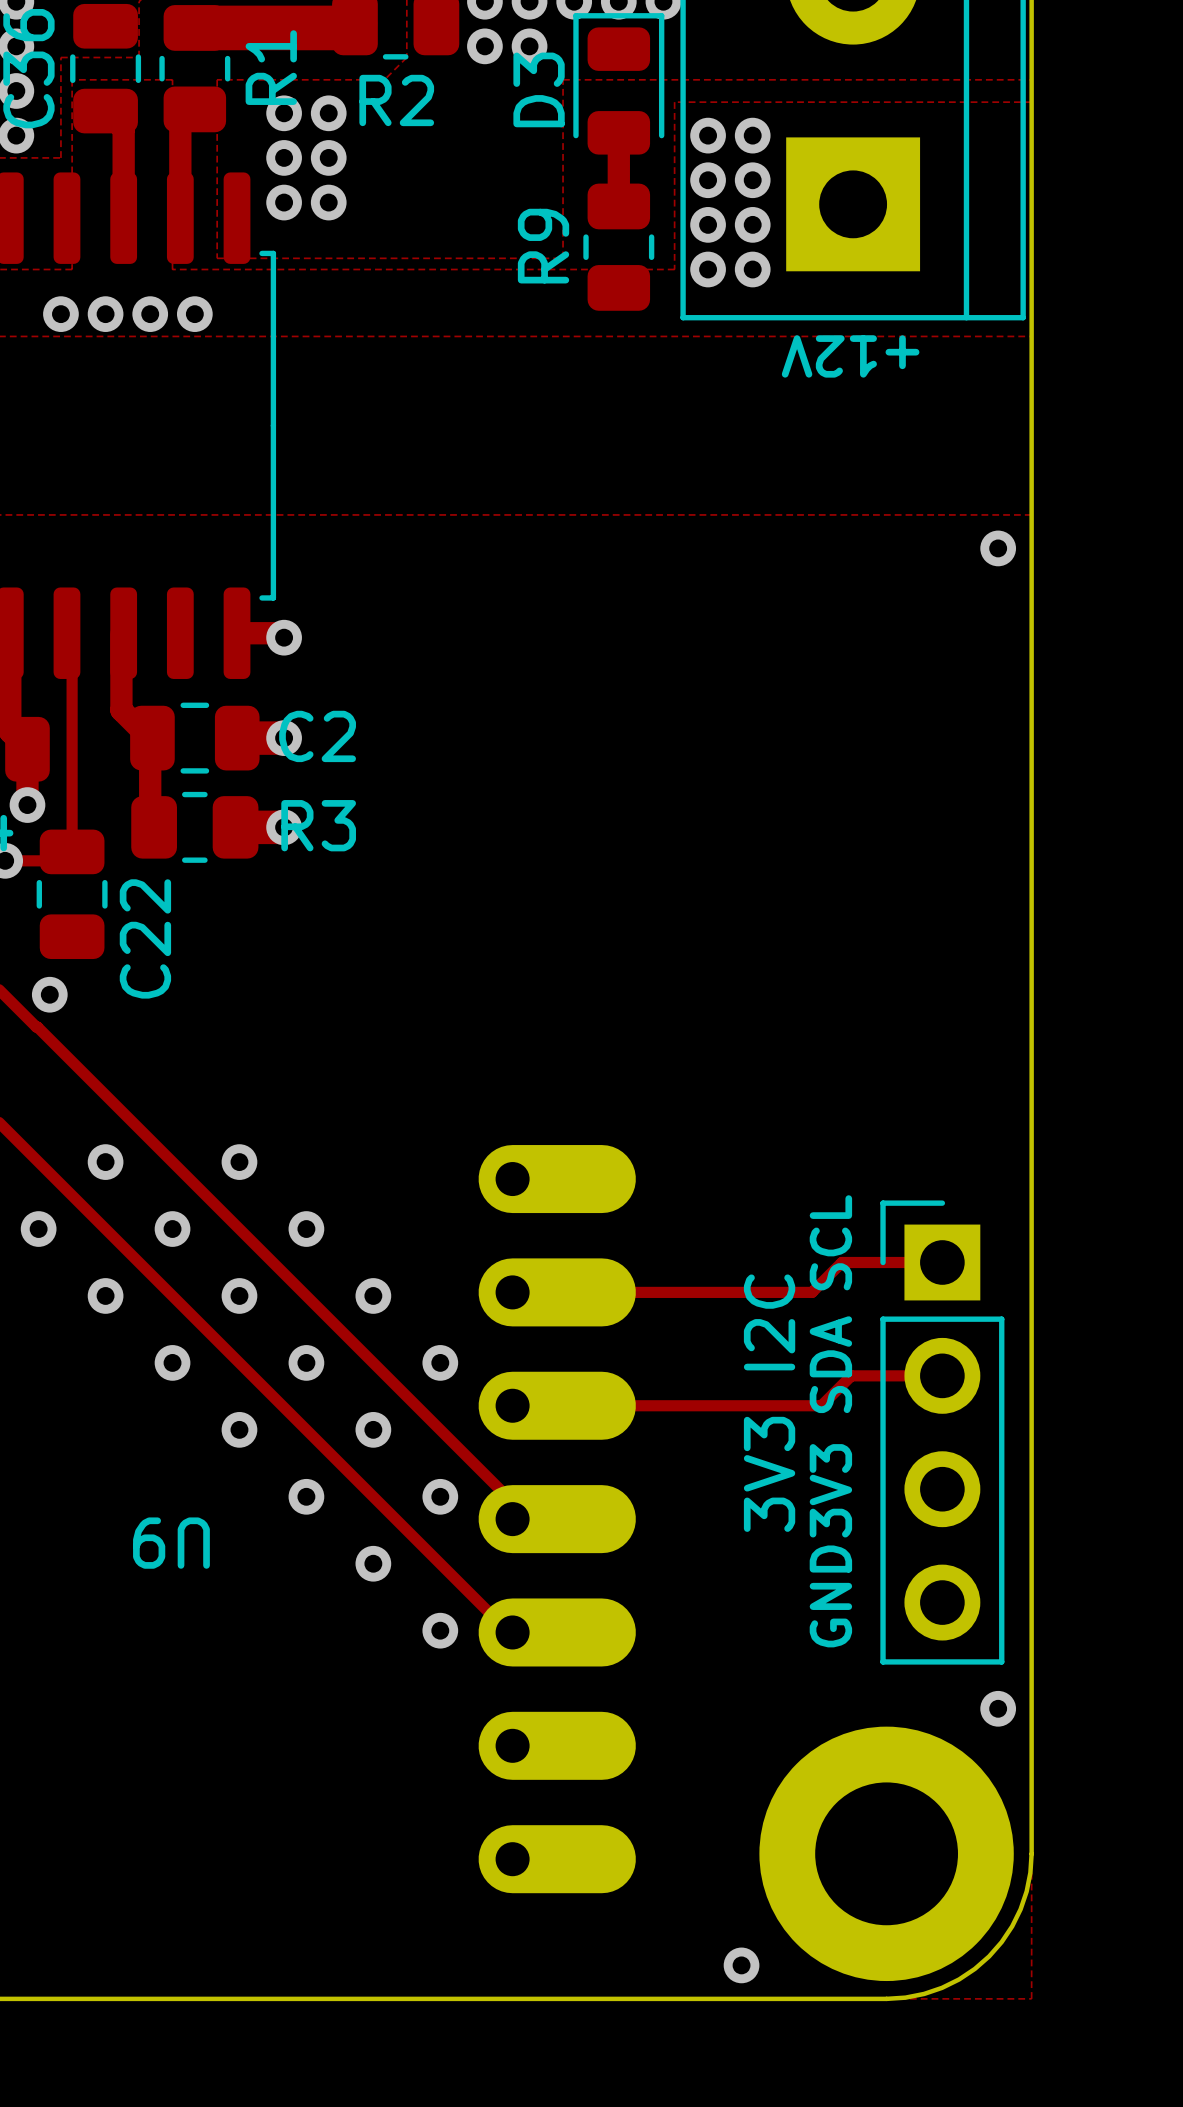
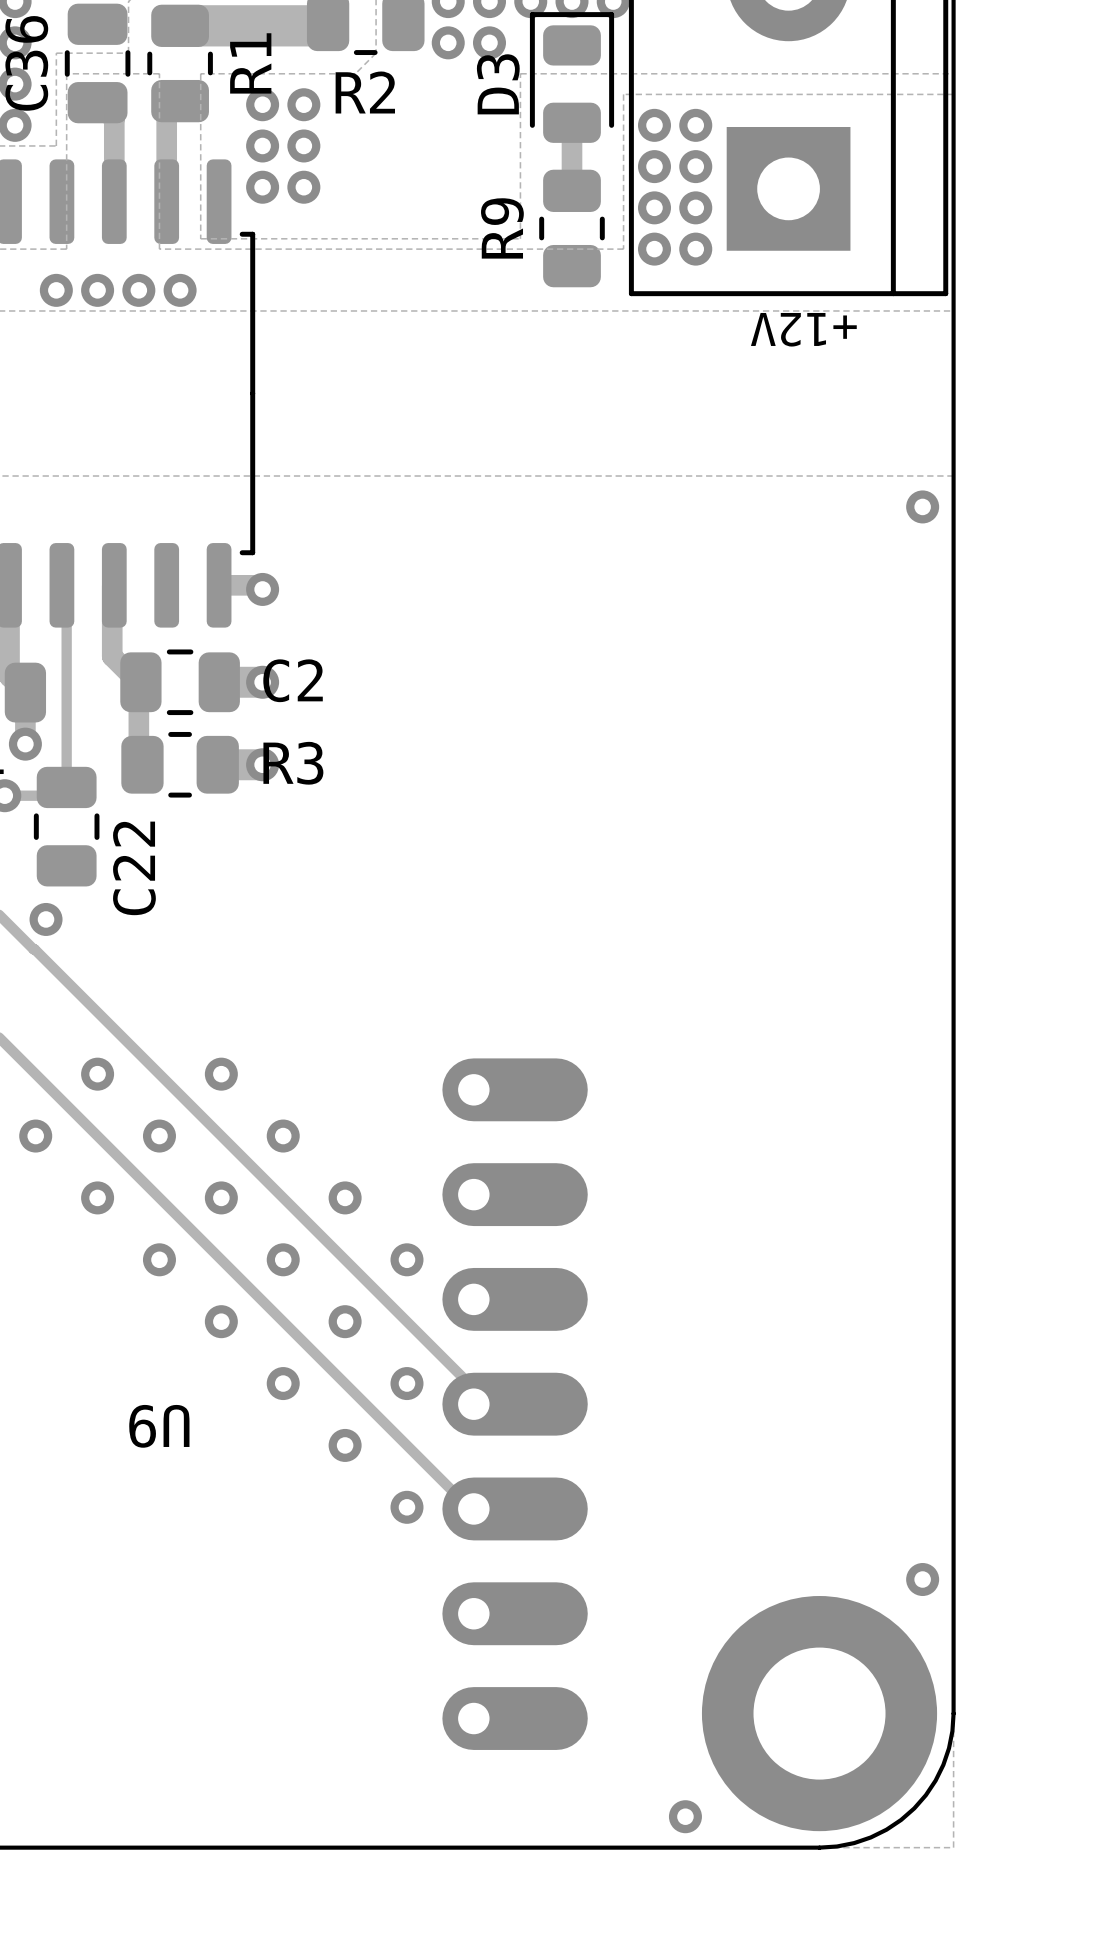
text: SCL (830, 1242) -> none
track: (942, 1262) (841, 1262) (812, 1292) (512, 1292) -> none
text: SDA (830, 1364) -> none
track: (942, 1375) (851, 1375) (821, 1405) (512, 1405) -> none
text: 3V3 I2C (769, 1403) -> none
part: (942, 1432) -> none
text: 3V3 (830, 1490) -> none
text: GND (830, 1596) -> none

